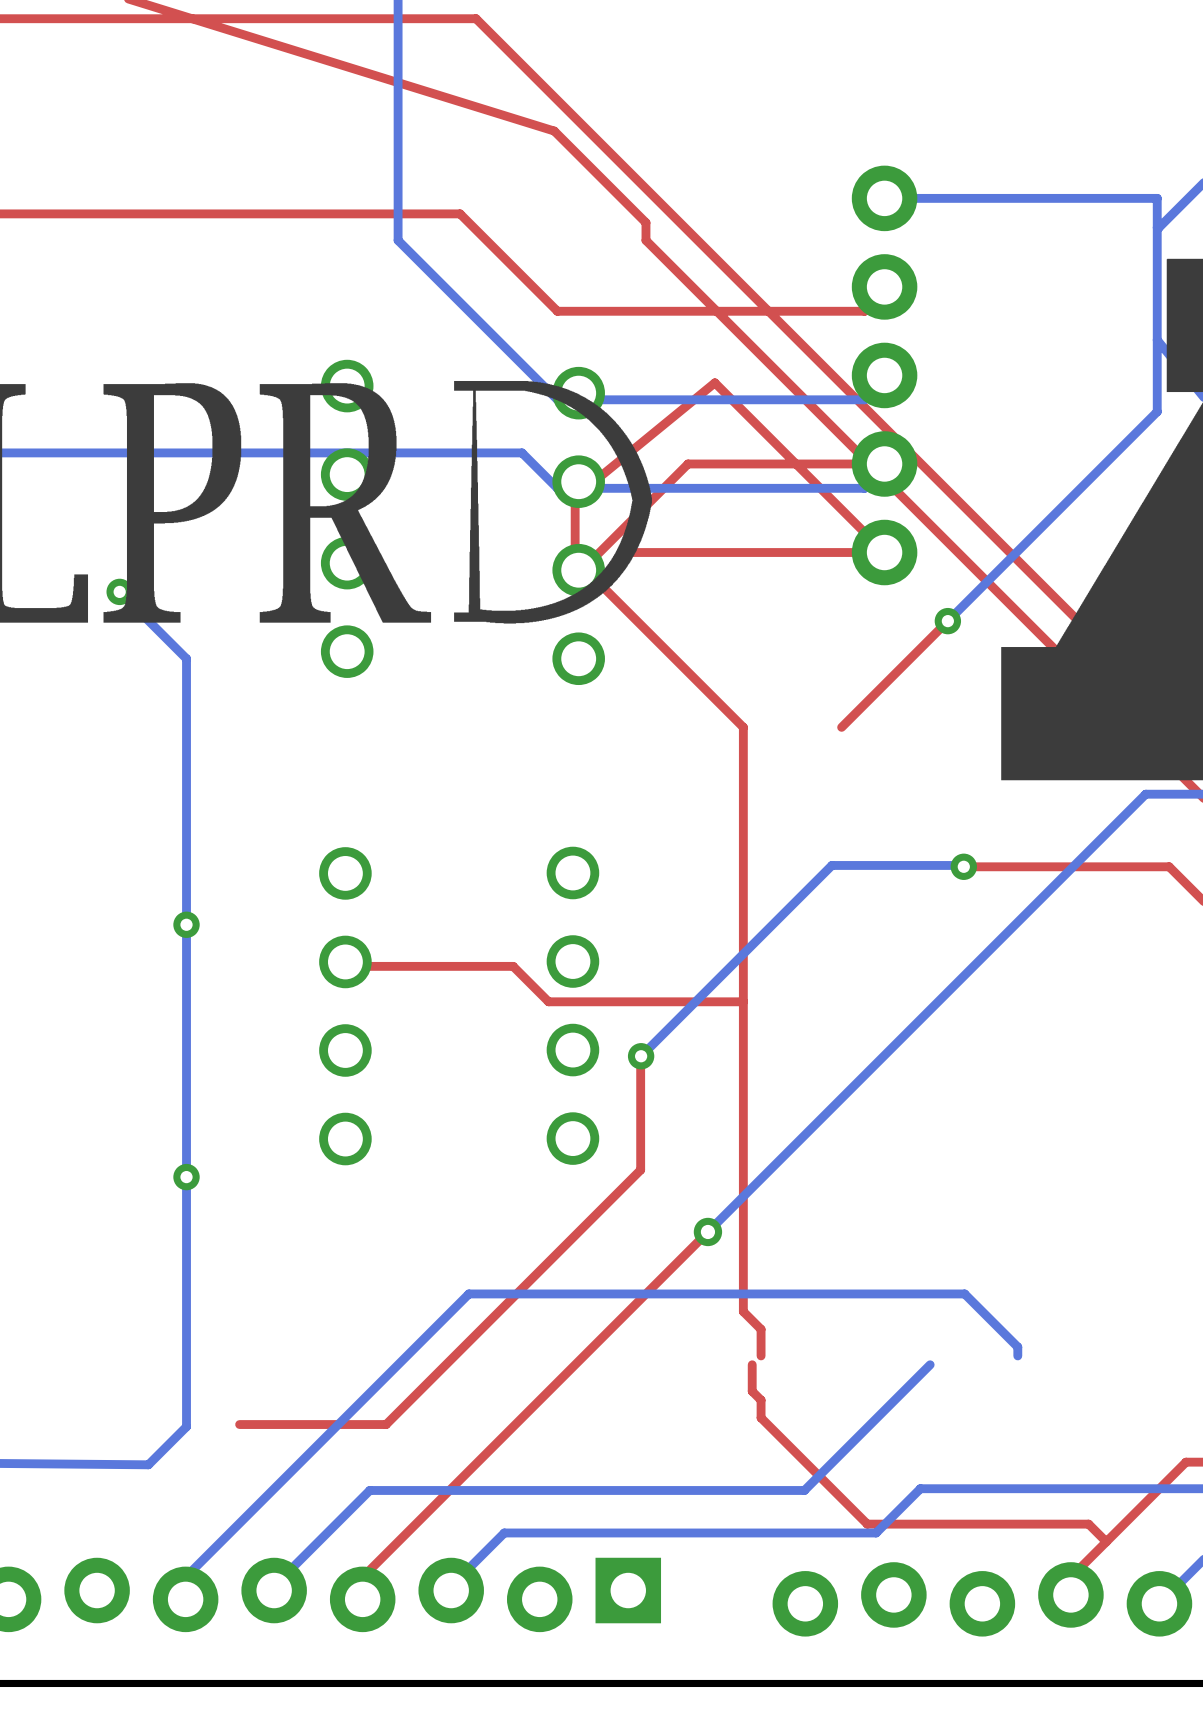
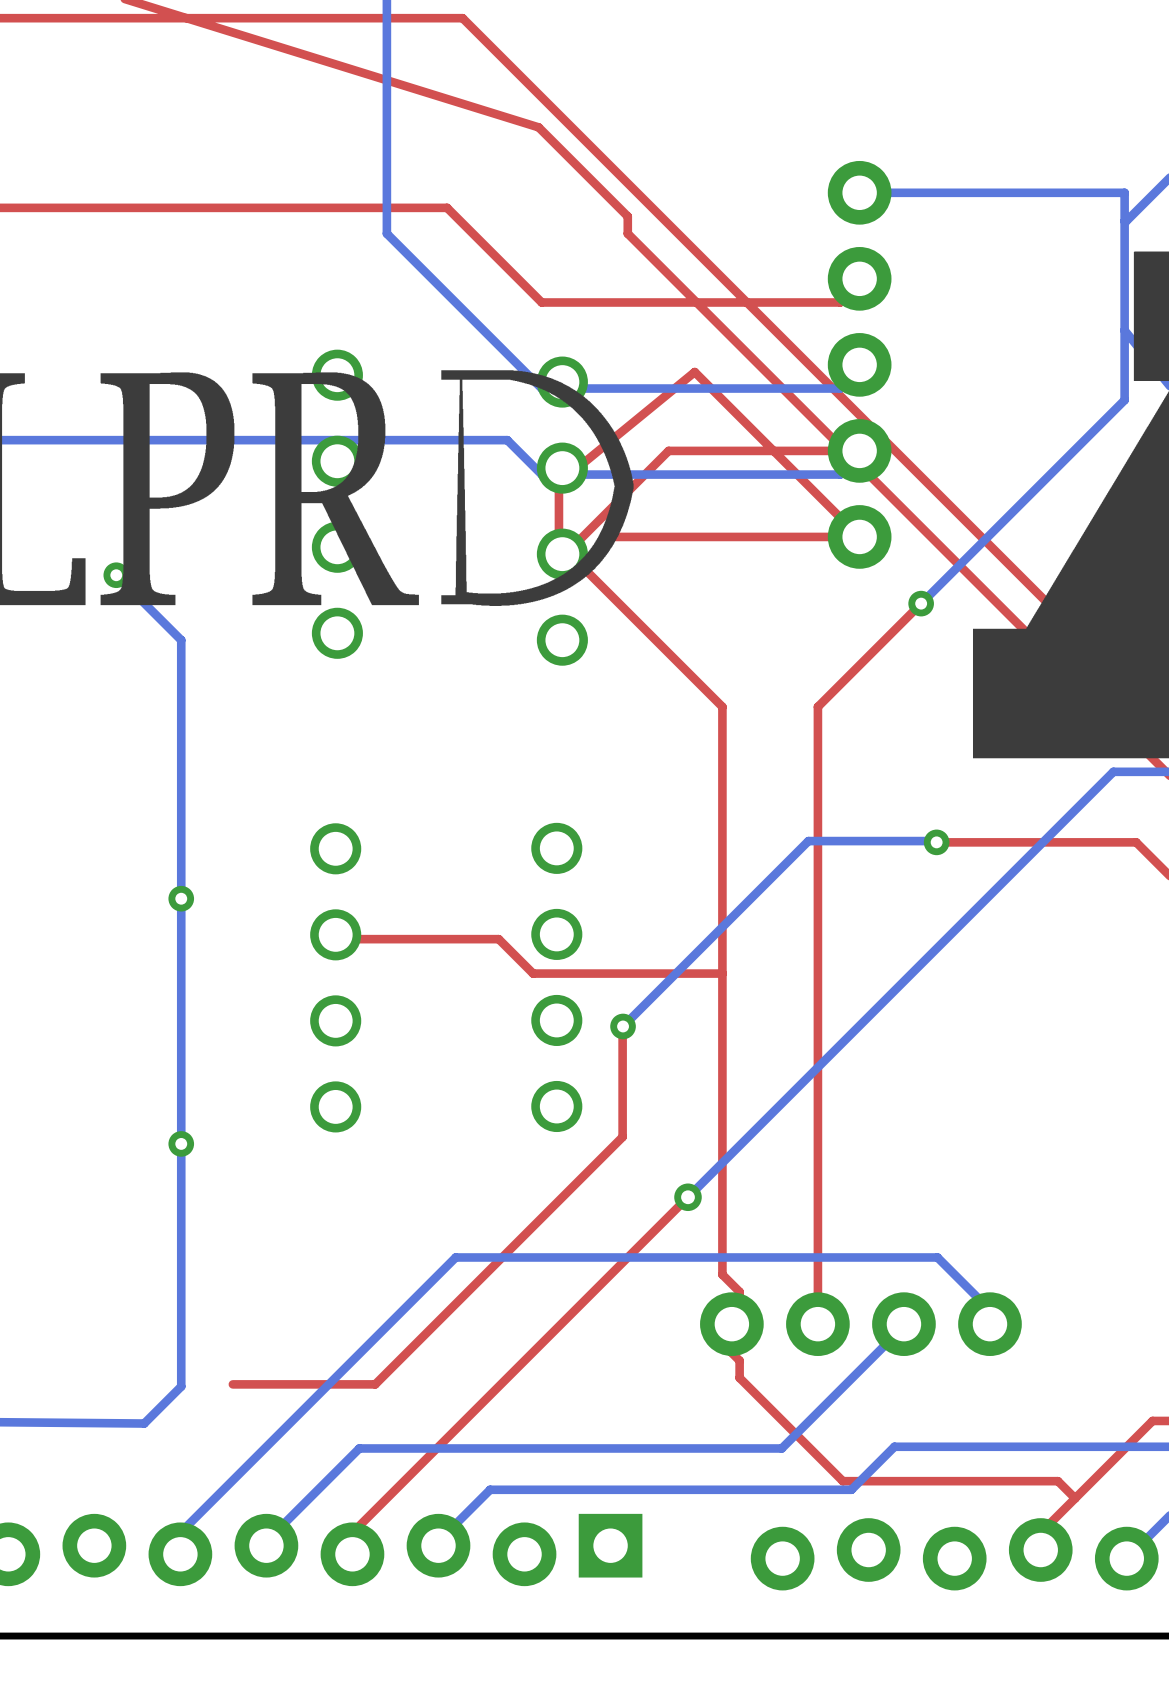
top track: none -> (817, 706) (817, 1324)
part: none -> (860, 1324)

